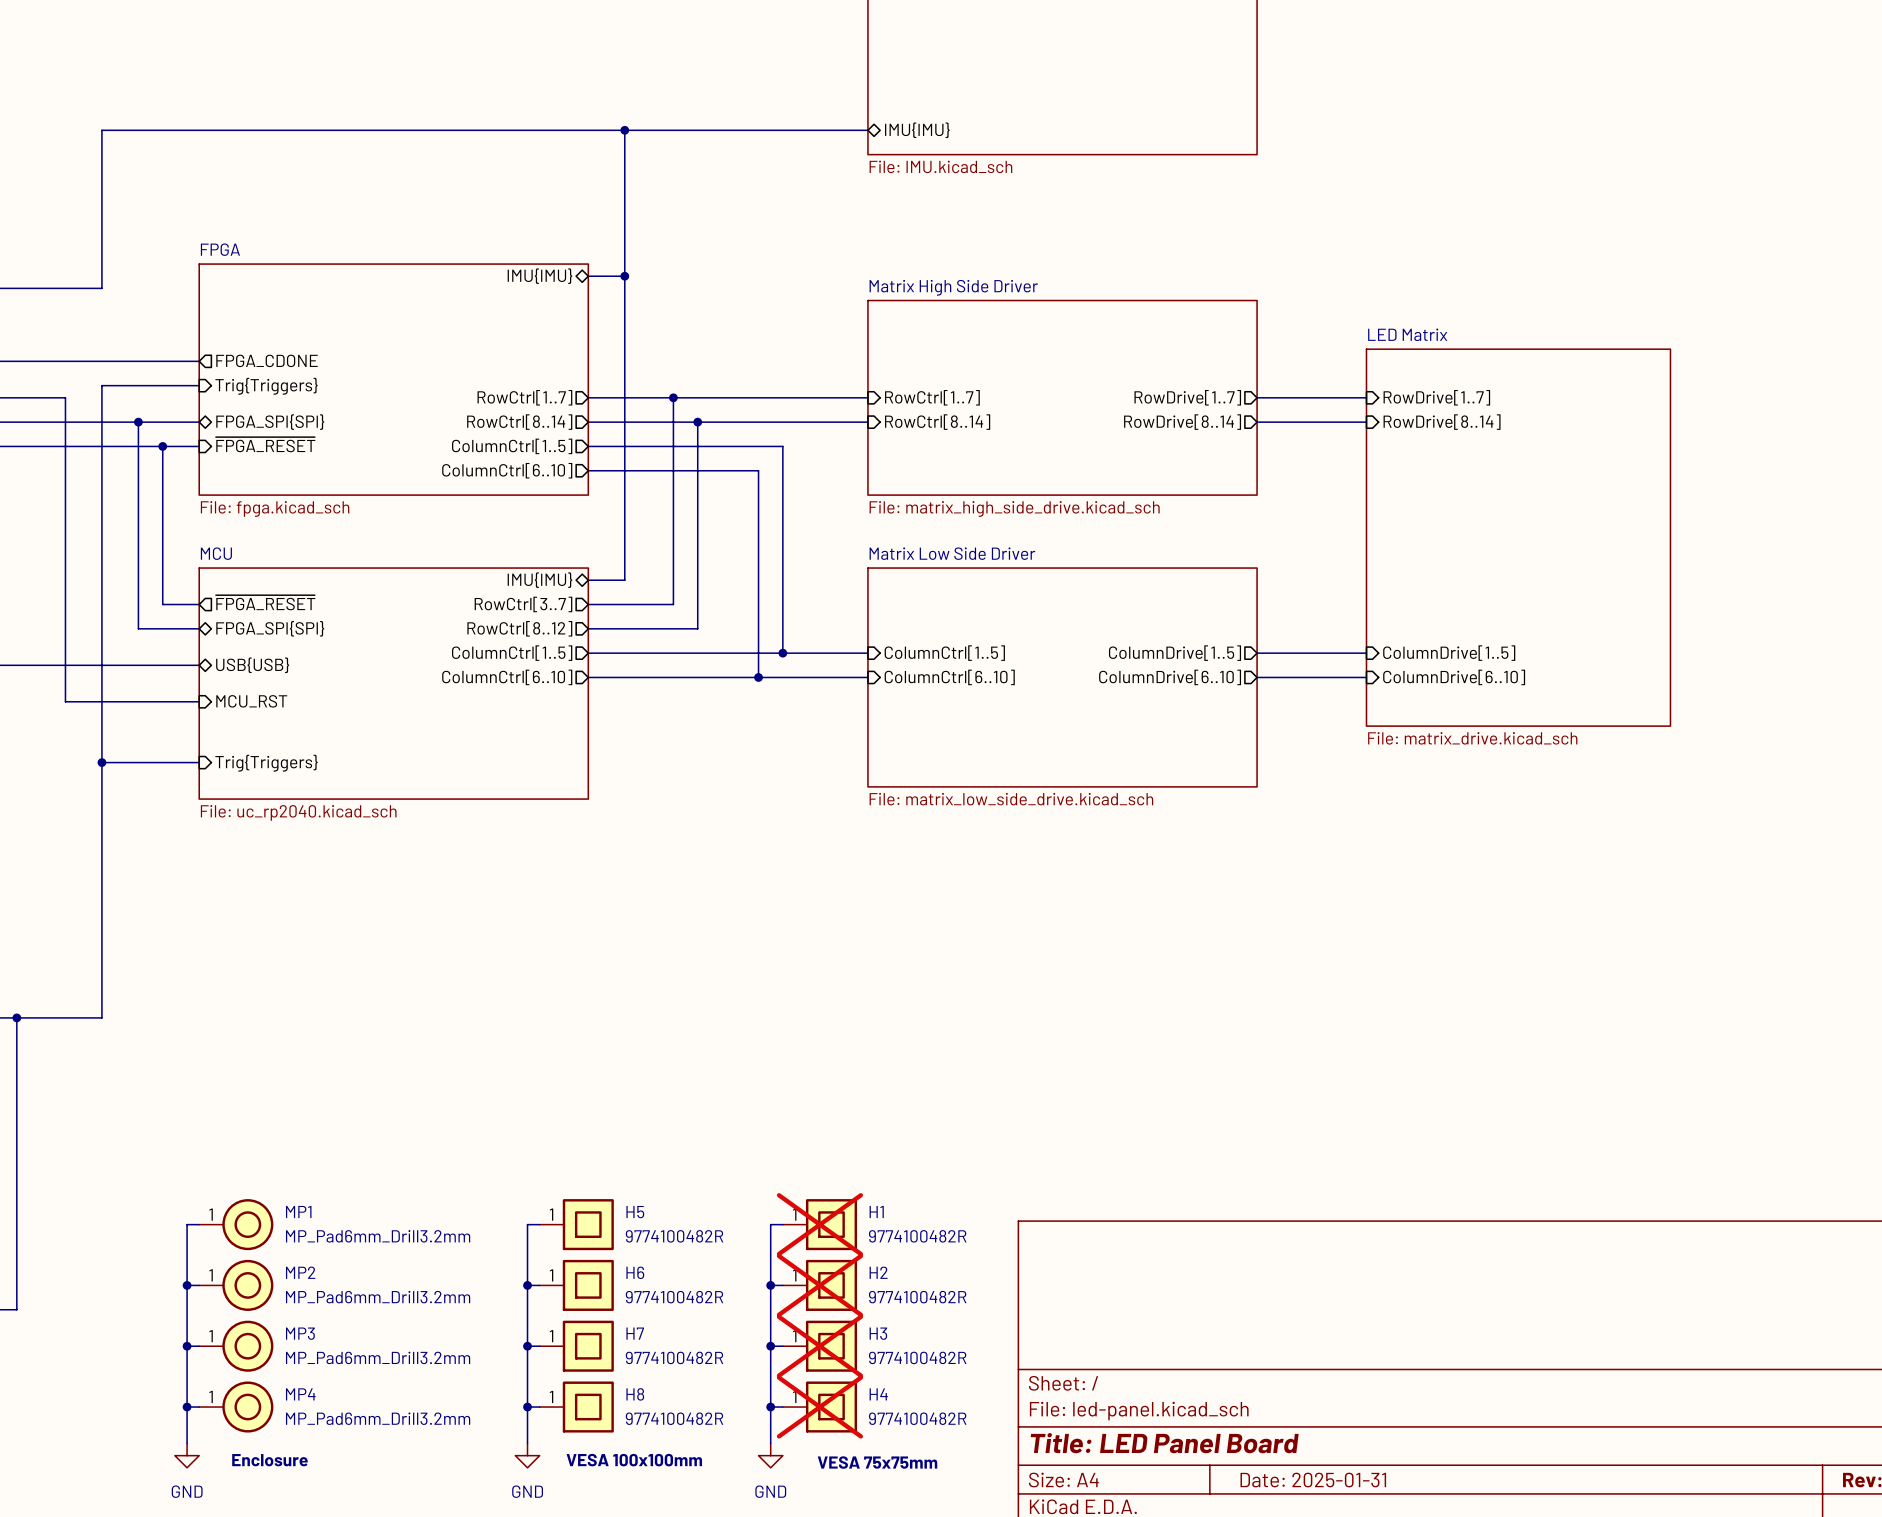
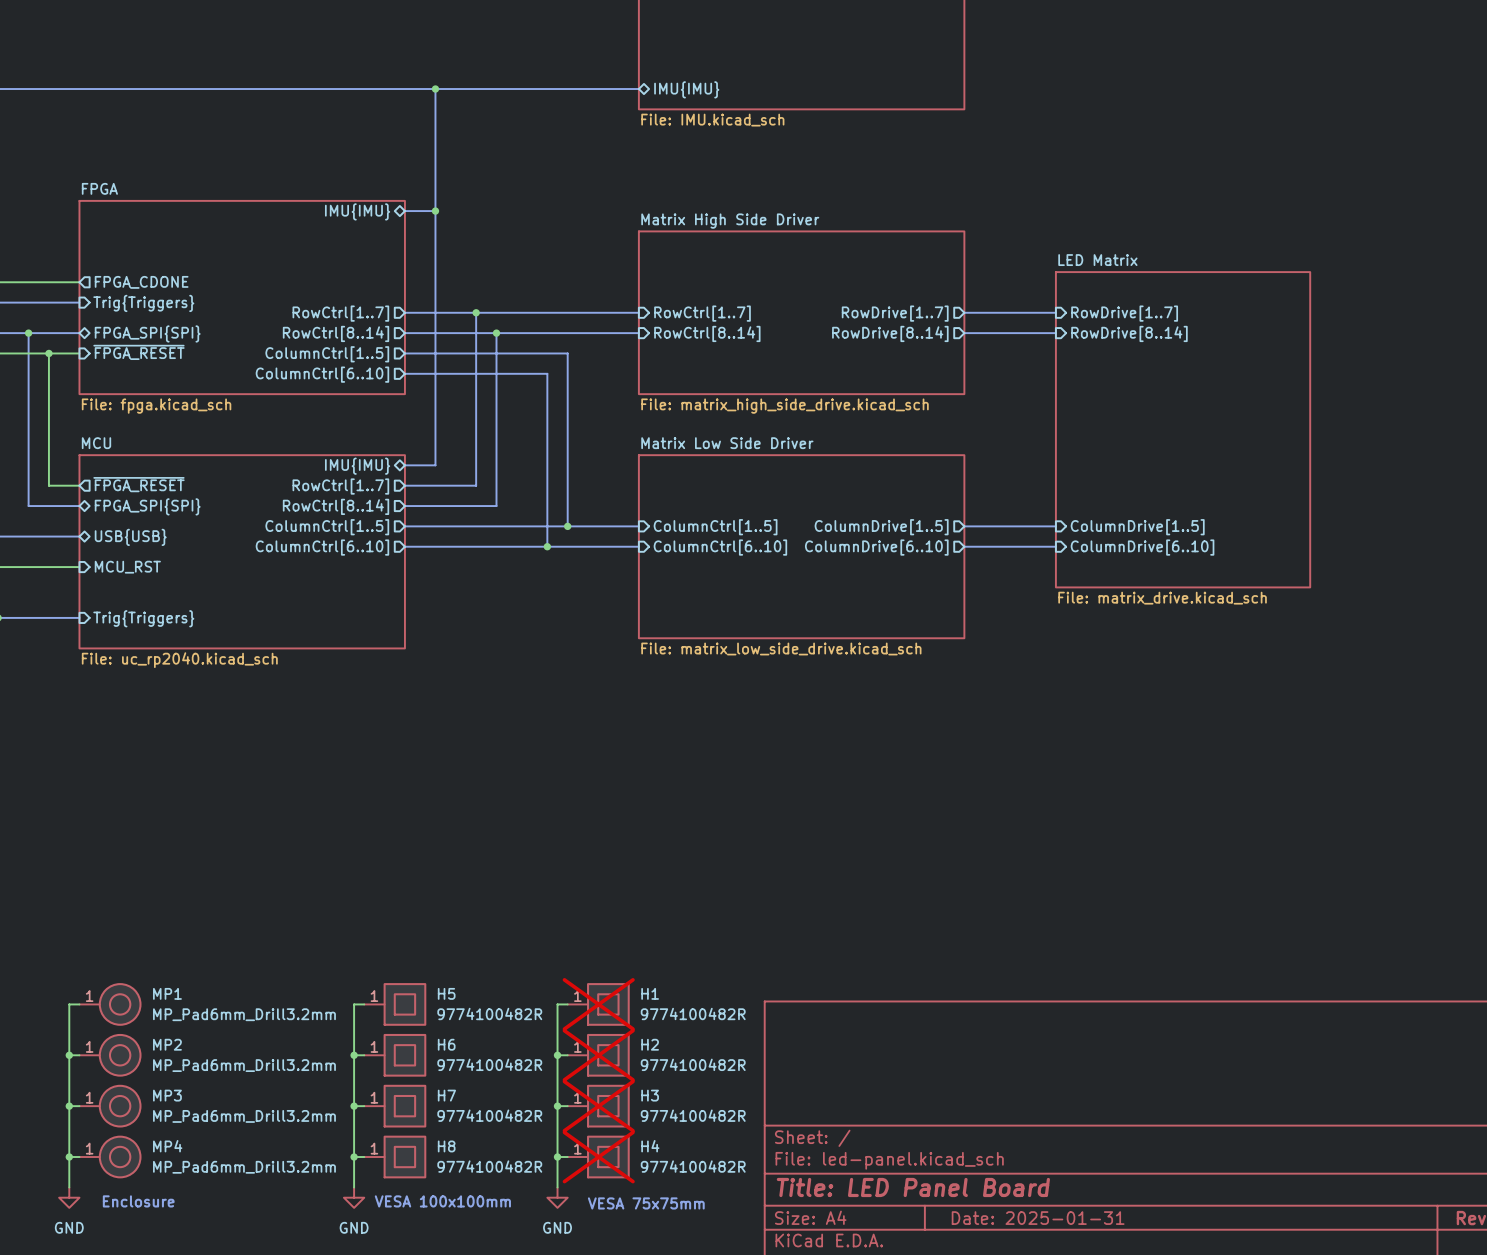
sheet pin: RowCtrl[3..7] (523, 604) -> RowCtrl[1..7] (340, 486)
sheet pin: RowCtrl[8..12] (519, 628) -> RowCtrl[8..14] (336, 506)

